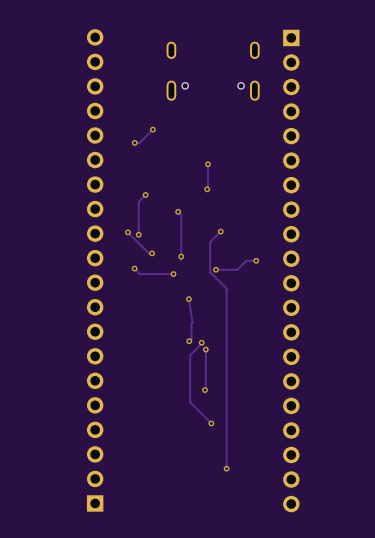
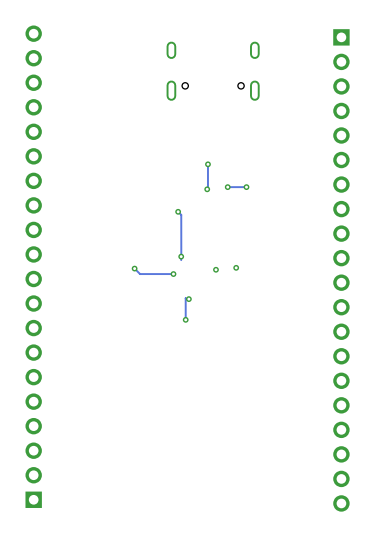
track: (152, 129) (139, 142) (134, 142) -> none
via: (152, 129) -> none
via: (134, 142) -> none
track: none -> (226, 186) (246, 187)
via: none -> (227, 187)
via: none -> (246, 187)
track: (145, 194) (138, 201) (138, 234) -> none
via: (145, 194) -> none
track: (220, 231) (210, 242) (210, 272) (226, 288) (226, 468) -> none
via: (220, 231) -> none
track: (127, 232) (148, 253) (152, 253) -> none
via: (127, 232) -> none
via: (138, 234) -> none
via: (152, 253) -> none
track: (256, 260) (246, 260) (237, 269) (215, 269) -> none
via: (256, 260) -> none
via: none -> (236, 267)
part position: (95, 270) -> (33, 266)
part position: (291, 271) -> (341, 270)
track: none -> (185, 298) (185, 319)
track: (188, 299) (192, 322) (191, 339) (189, 341) -> none
via: none -> (185, 319)
via: (189, 341) -> none
track: (201, 342) (190, 355) (190, 402) (211, 423) -> none
via: (201, 342) -> none
track: (205, 349) (204, 390) -> none
via: (205, 349) -> none
via: (204, 390) -> none
via: (211, 423) -> none
via: (226, 468) -> none

